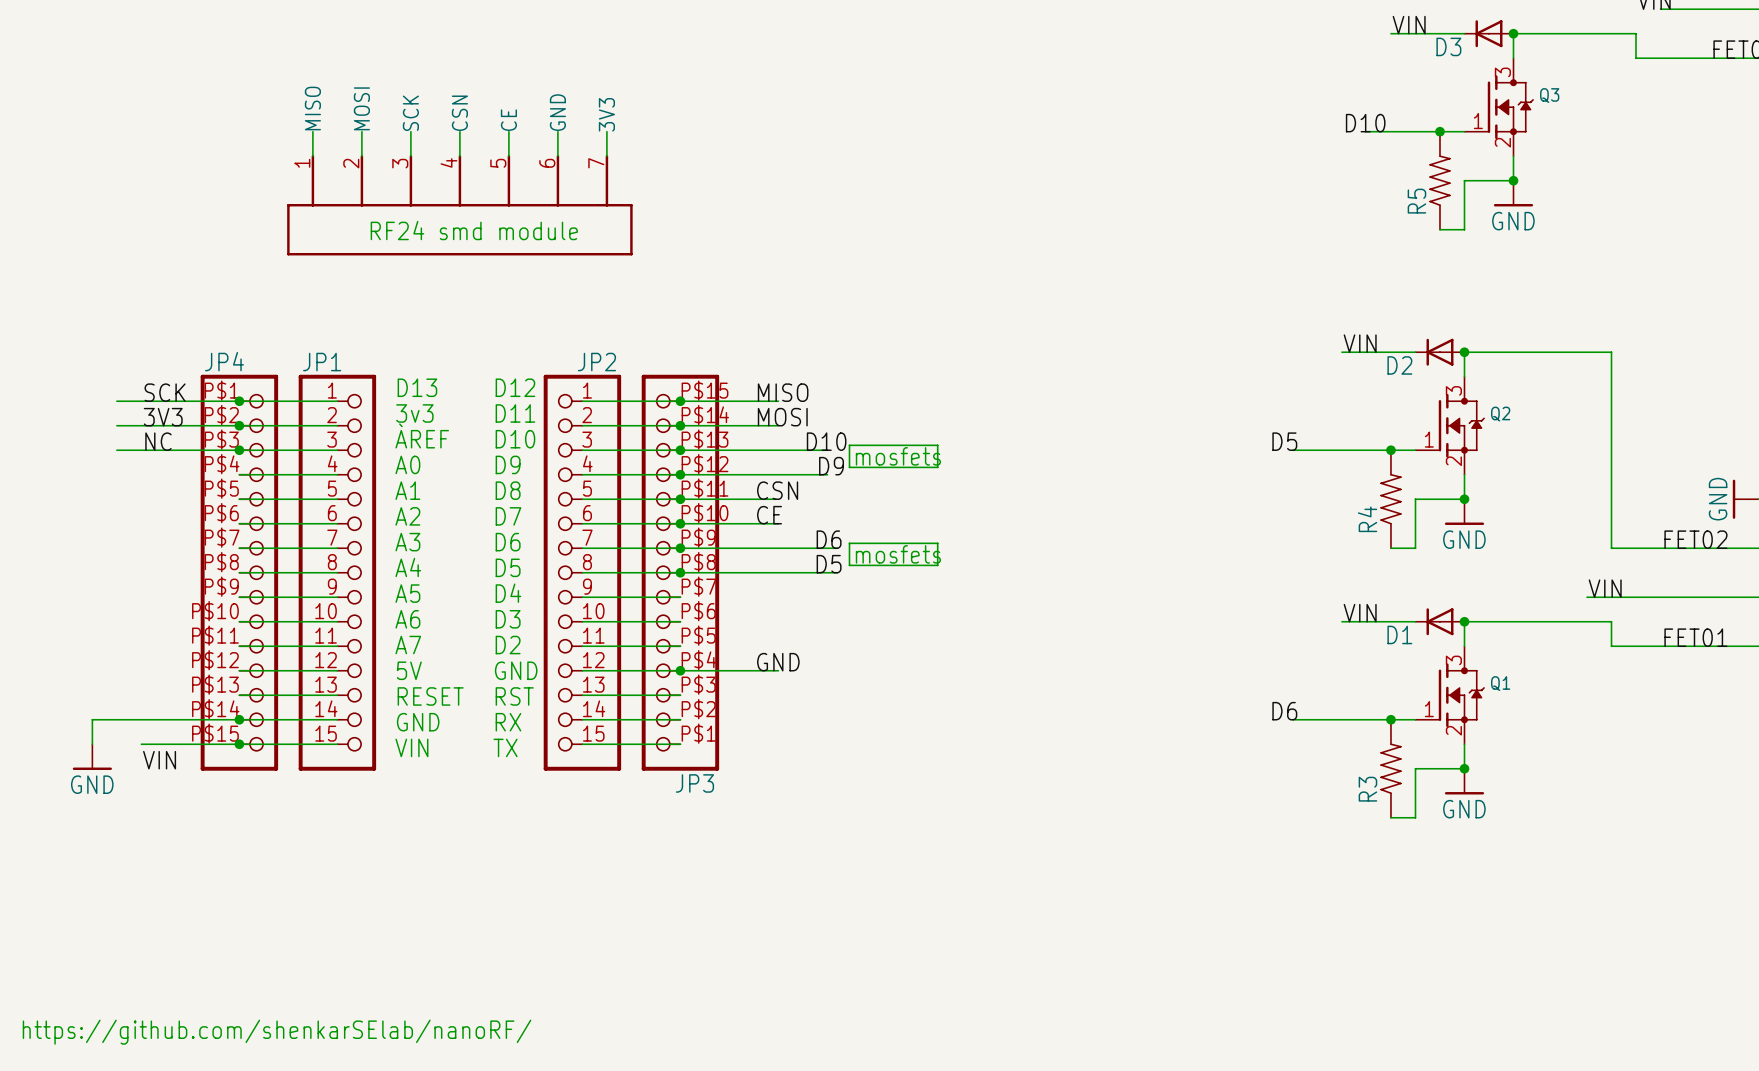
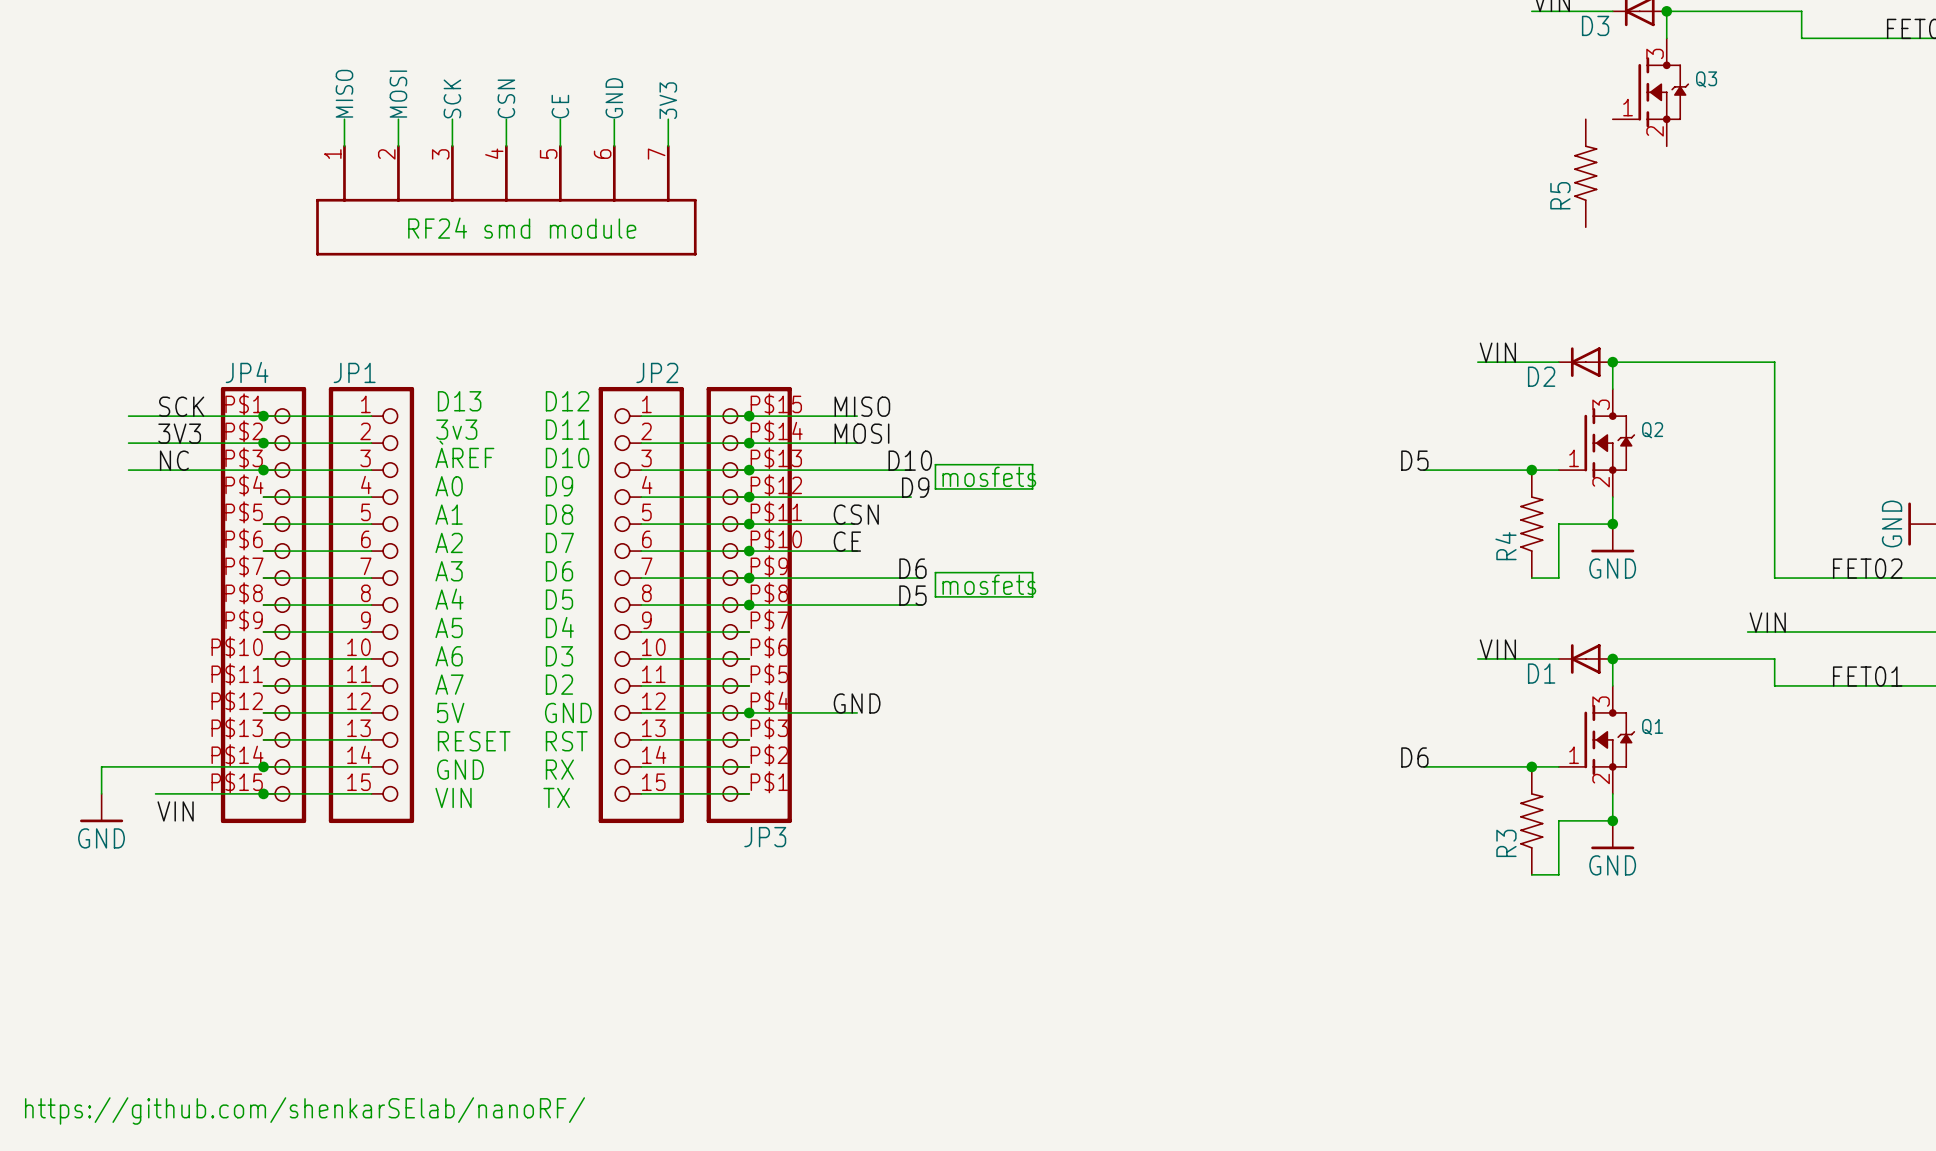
label: D10 (1365, 123) -> none
wire: (1366, 131) (1464, 131) -> none
junction: (1439, 131) -> none
wire: (1513, 156) (1513, 180) (1464, 180) (1464, 229) (1439, 229) -> none
junction: (1513, 180) -> none
power symbol: GND (1513, 193) -> none

